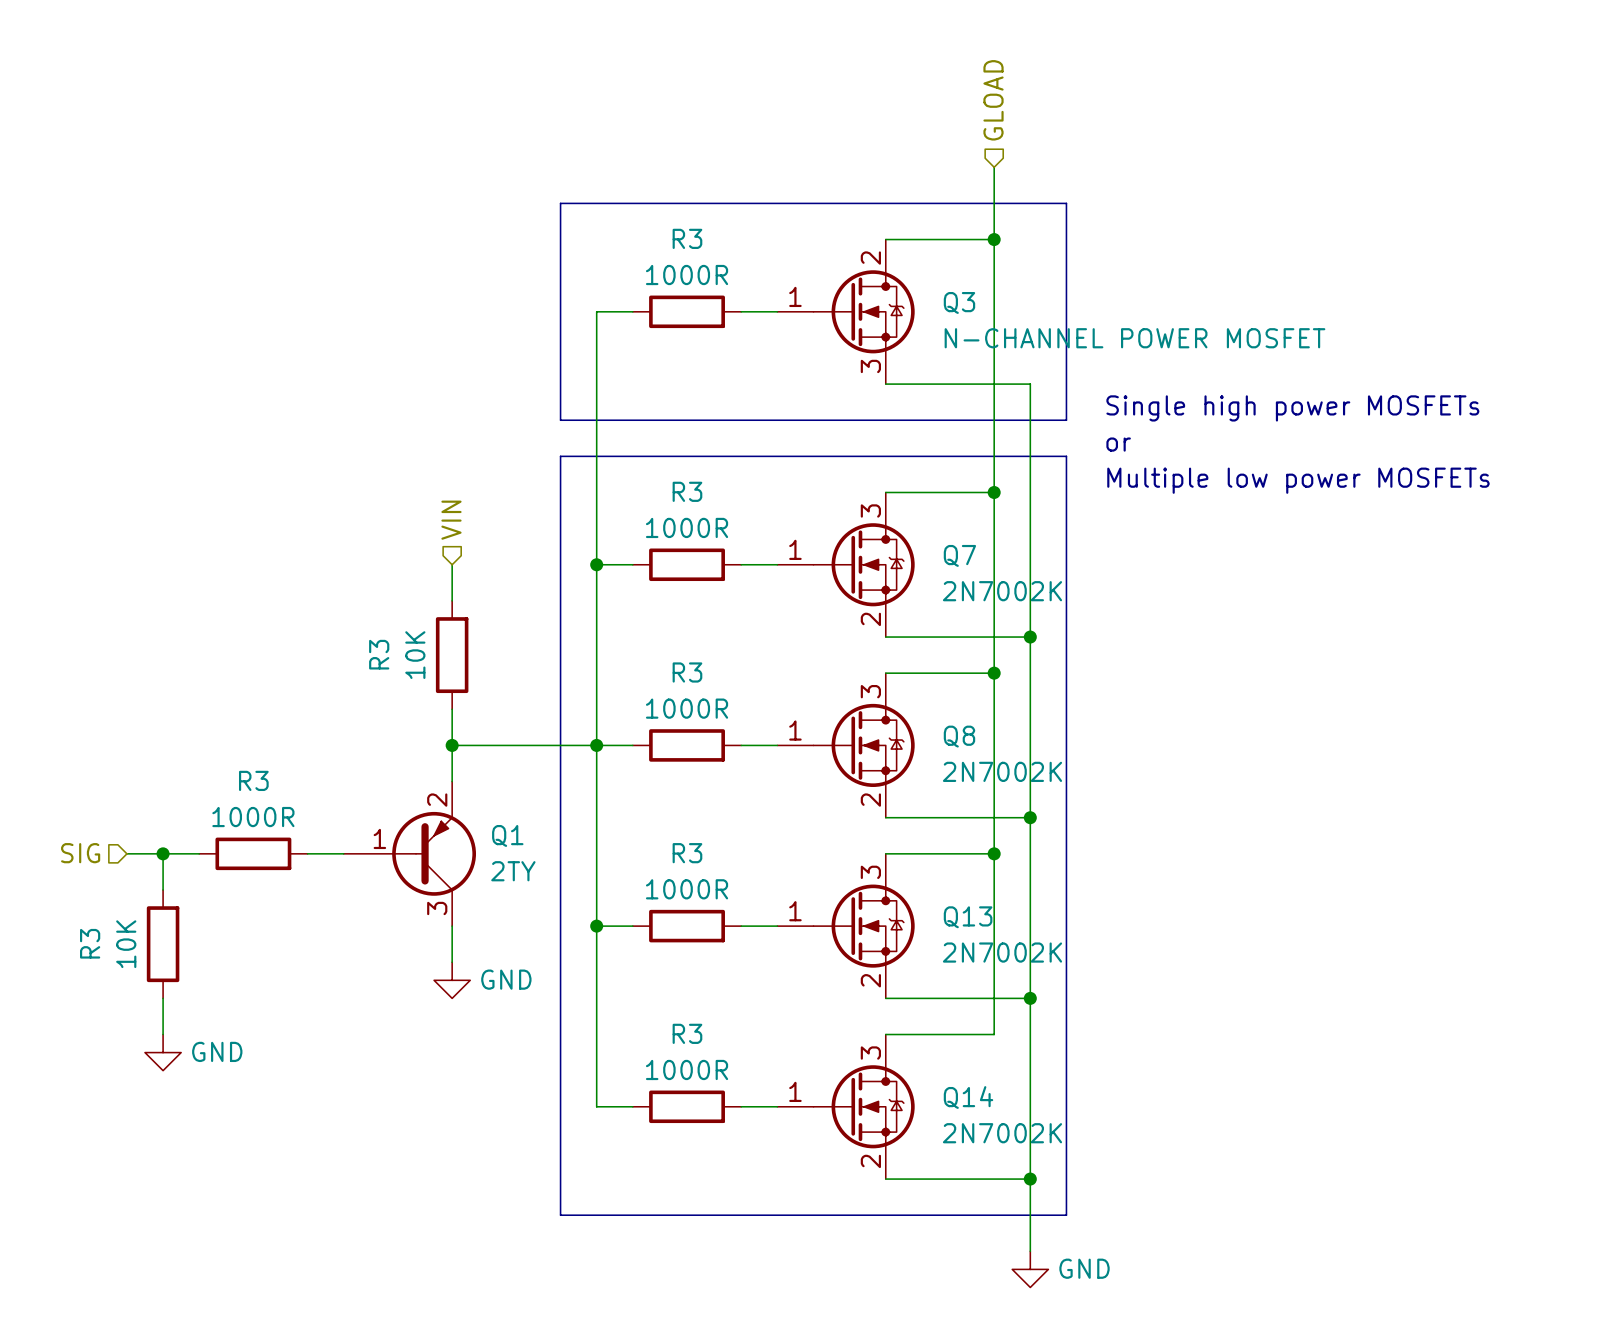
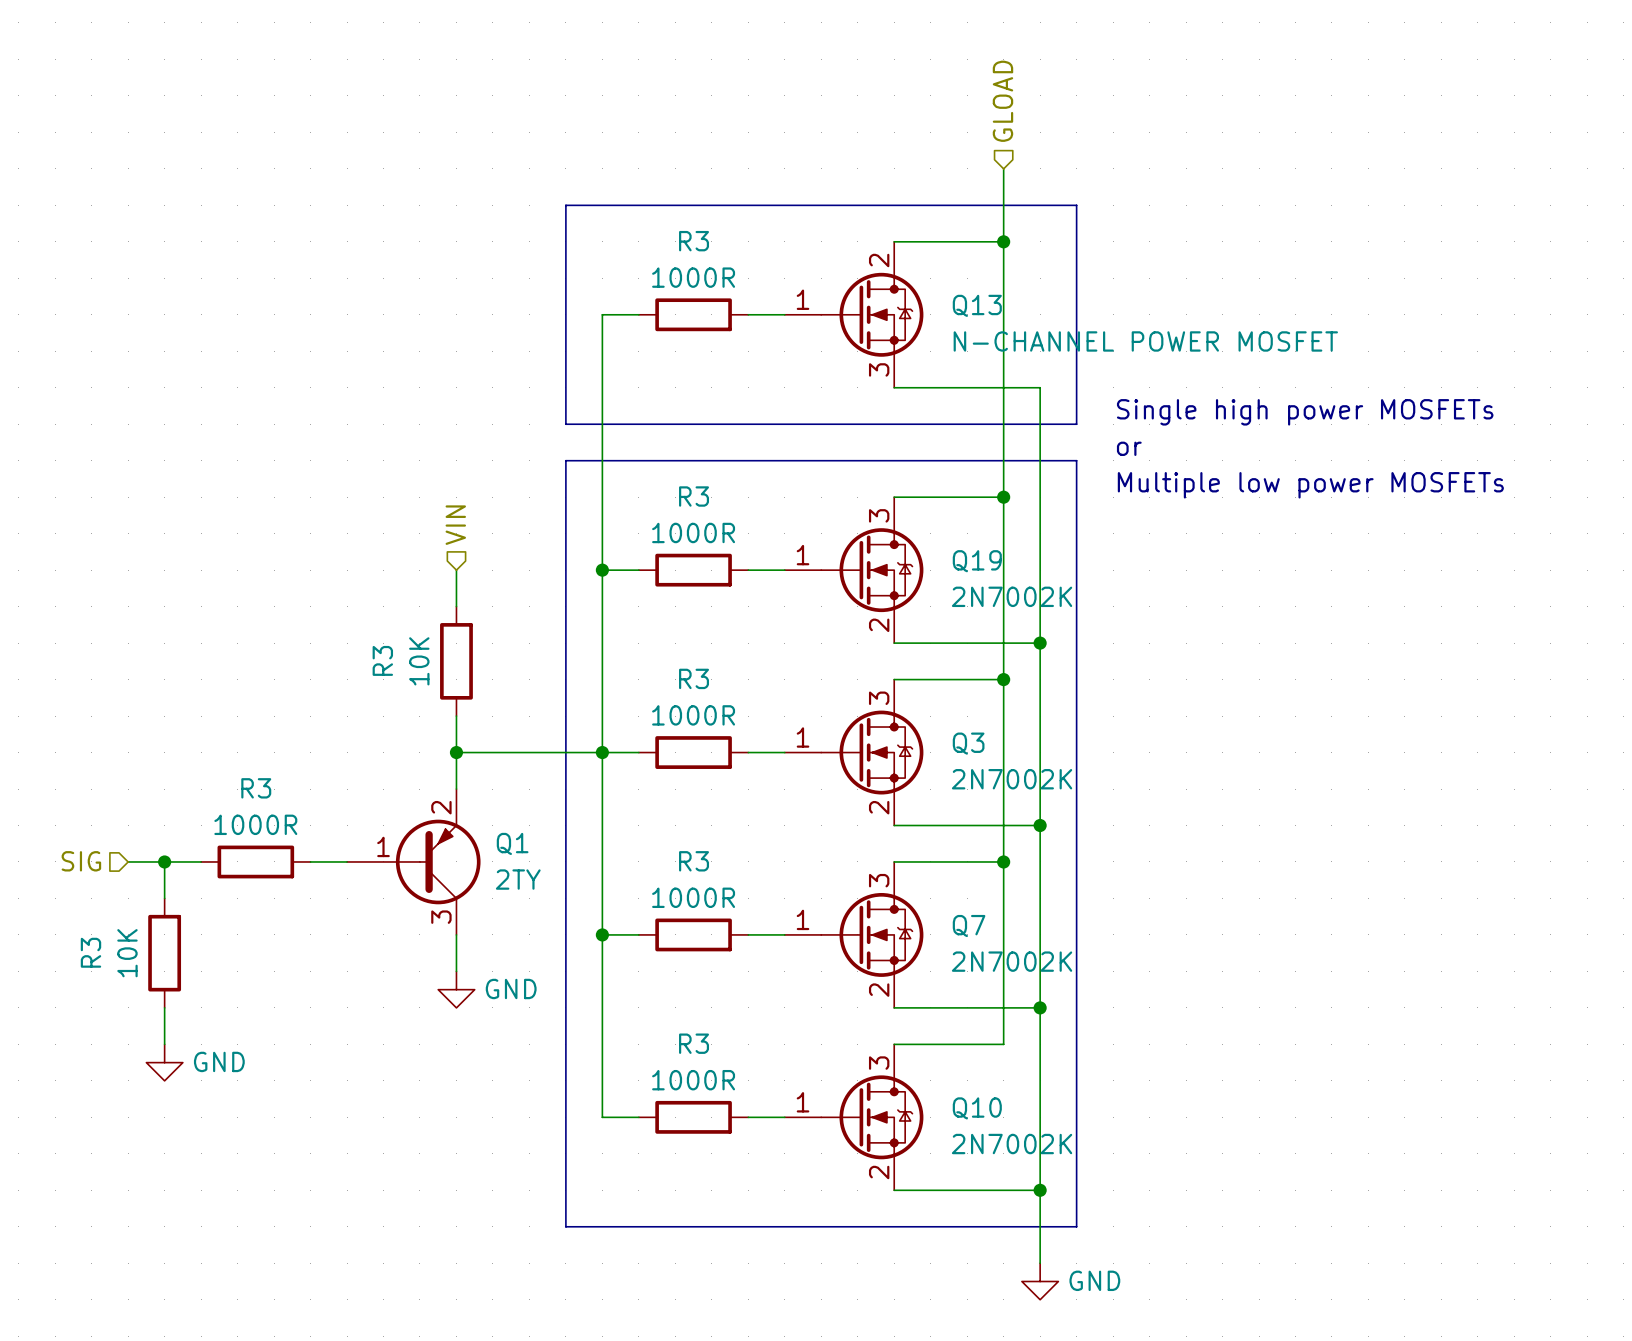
Q3 name: Q3 (959, 302) -> Q13 (977, 305)
Q7 name: Q7 (959, 555) -> Q19 (977, 561)
Q8 name: Q8 (959, 736) -> Q3 (968, 743)
Q13 name: Q13 (968, 917) -> Q7 (969, 926)
Q14 name: Q14 (968, 1097) -> Q10 (977, 1108)

